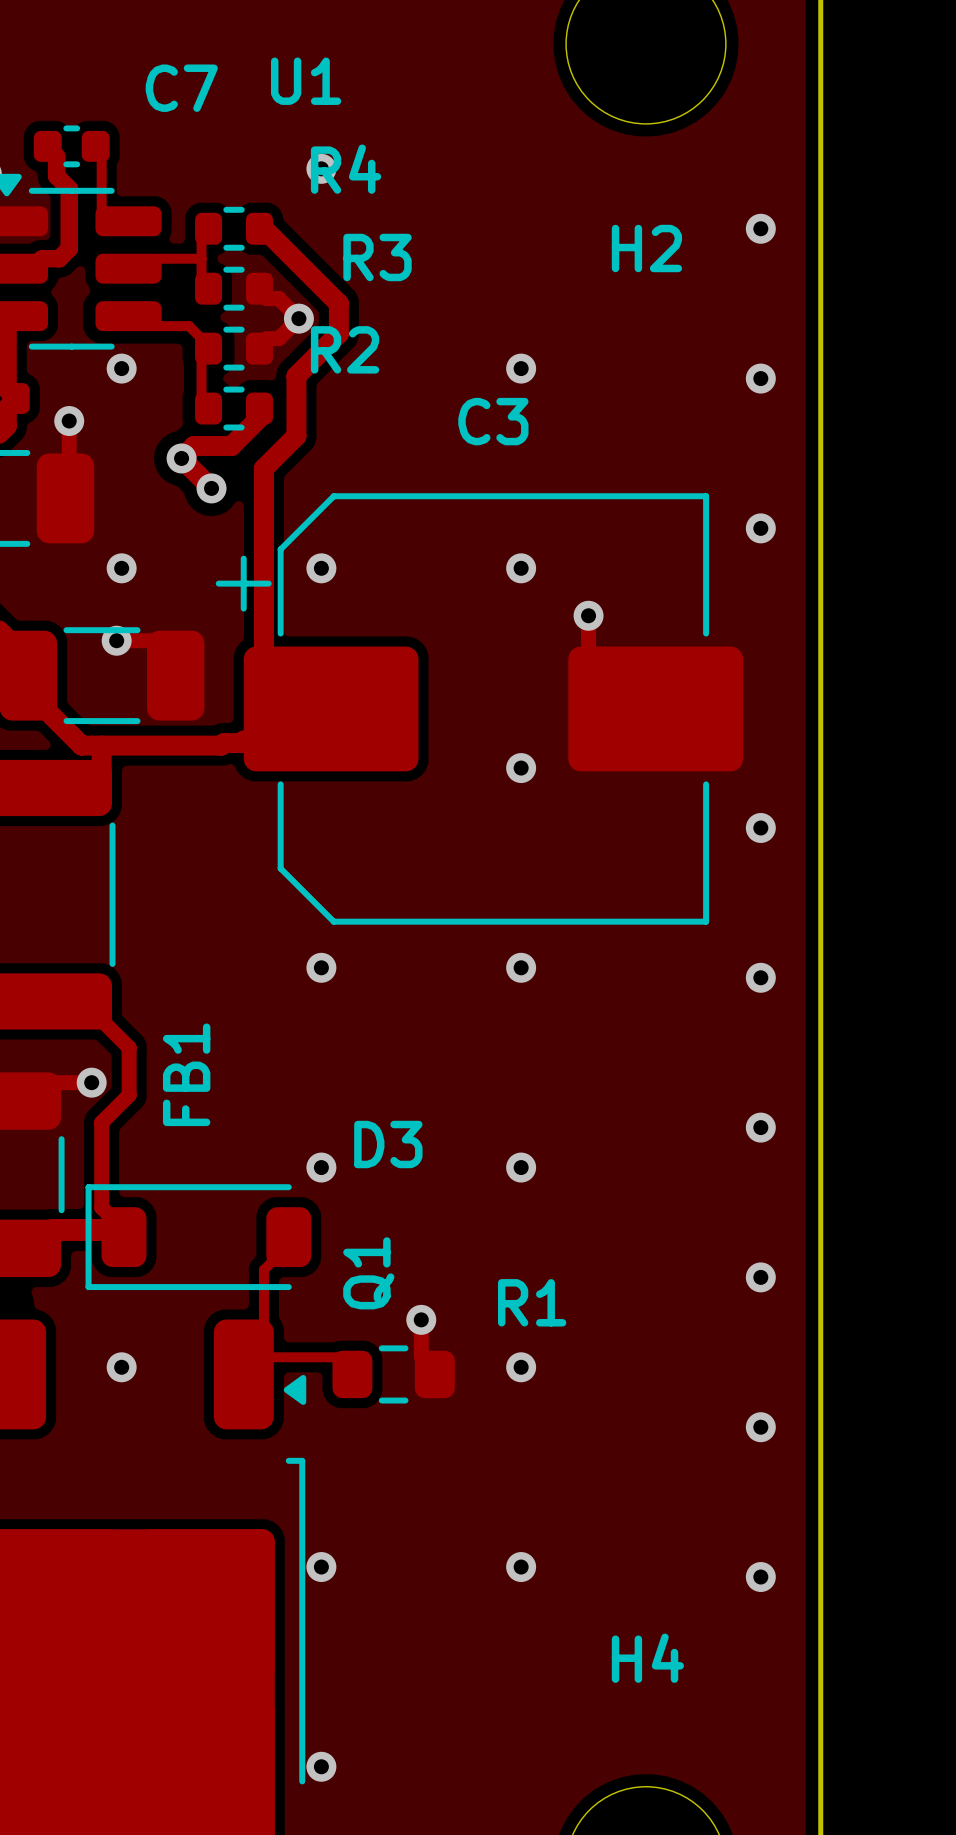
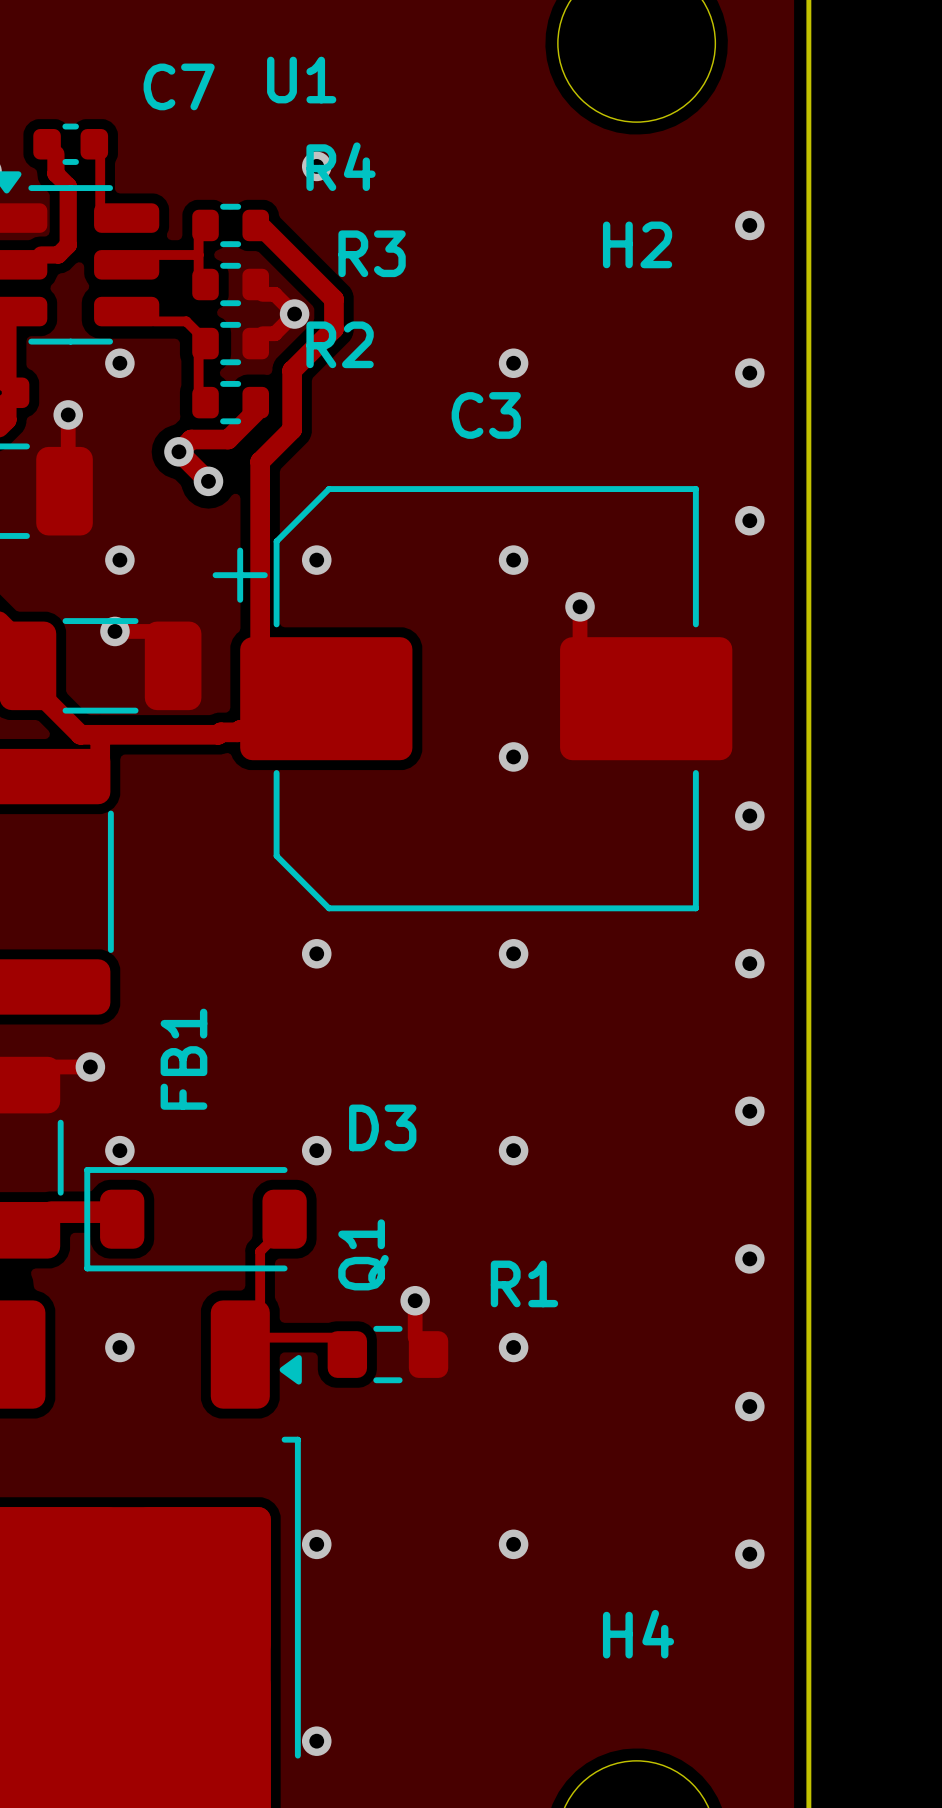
track: (101, 1020) (129, 1047) (129, 1095) (101, 1122) (101, 1207) (109, 1214) -> none
via: none -> (119, 1150)

